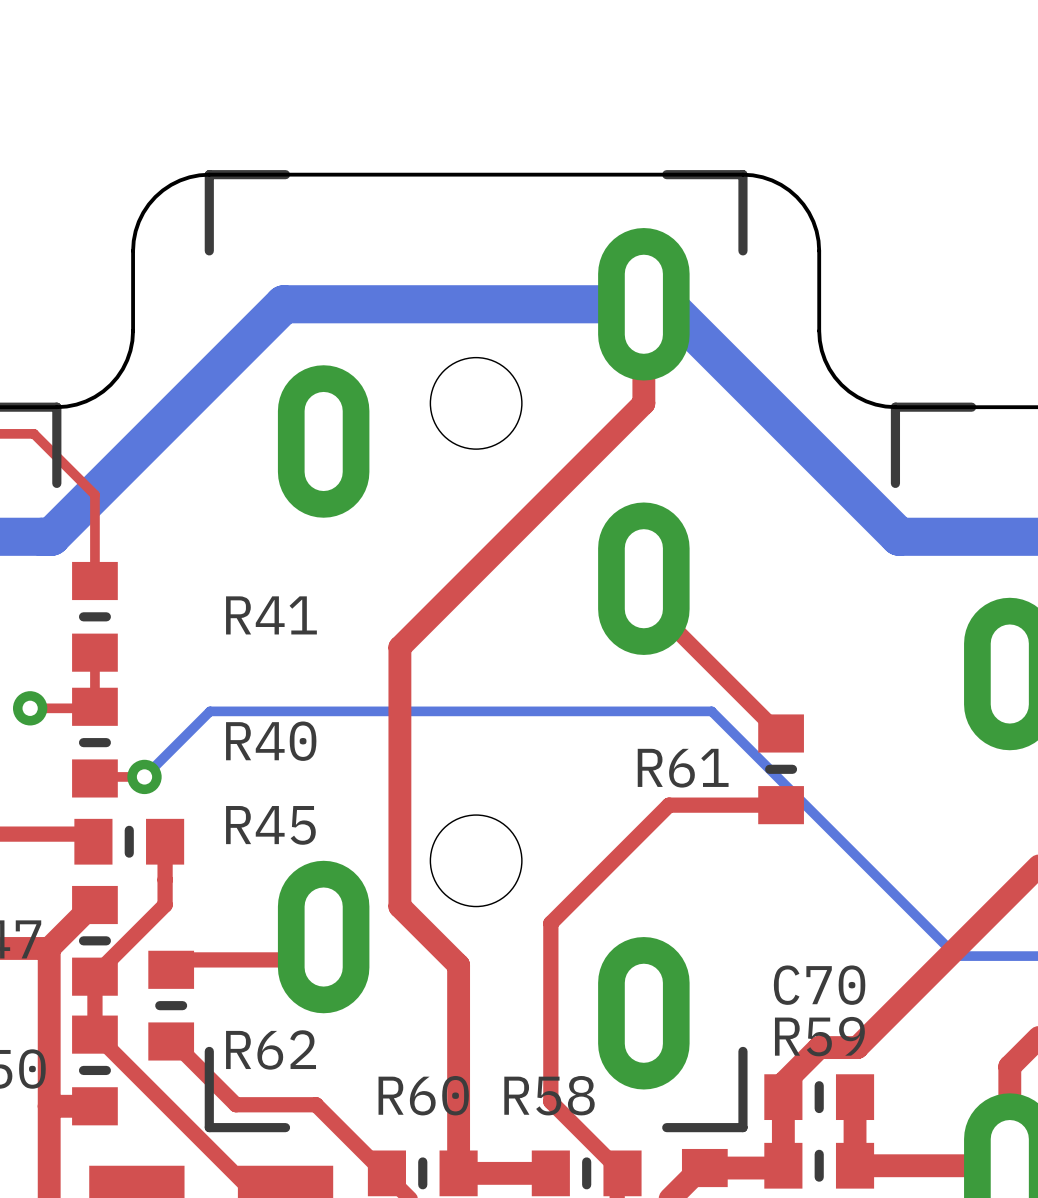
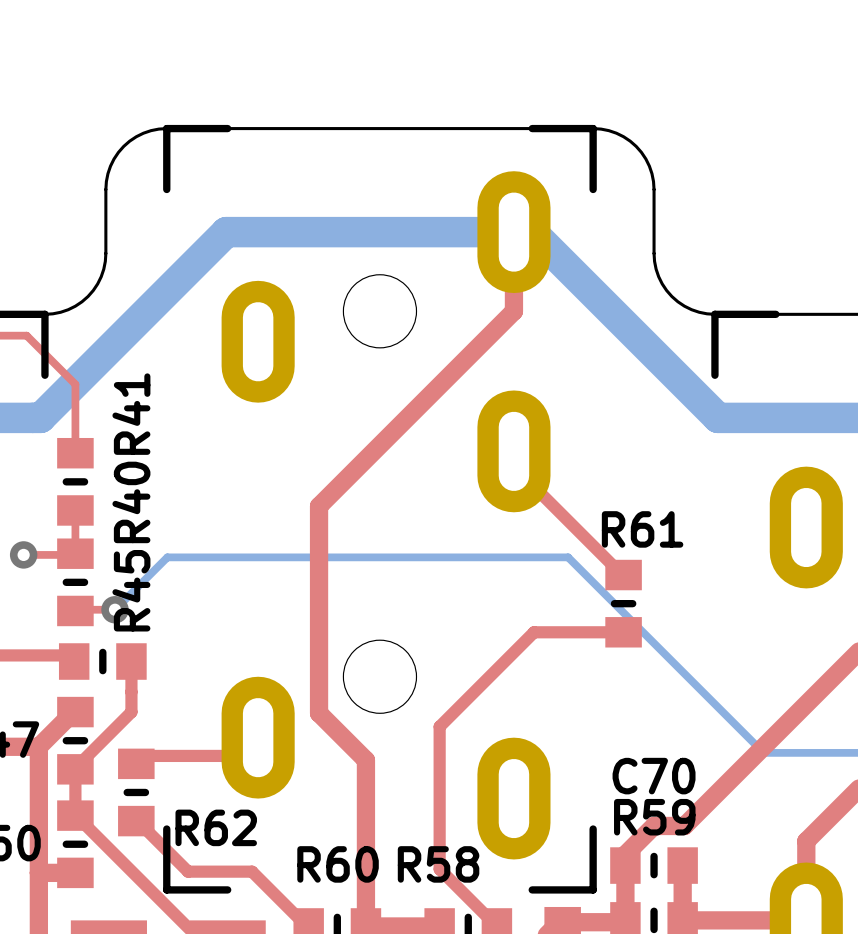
R41 name rotation: 0° (271, 615) -> 90° counterclockwise (131, 414)
R40 name rotation: 0° (271, 741) -> 90° counterclockwise (131, 502)
R40 name position: R40 (271, 741) -> R40 (131, 502)
R61 name position: R61 (683, 768) -> R61 (642, 529)
R45 name rotation: 0° (270, 825) -> 90° counterclockwise (131, 590)

